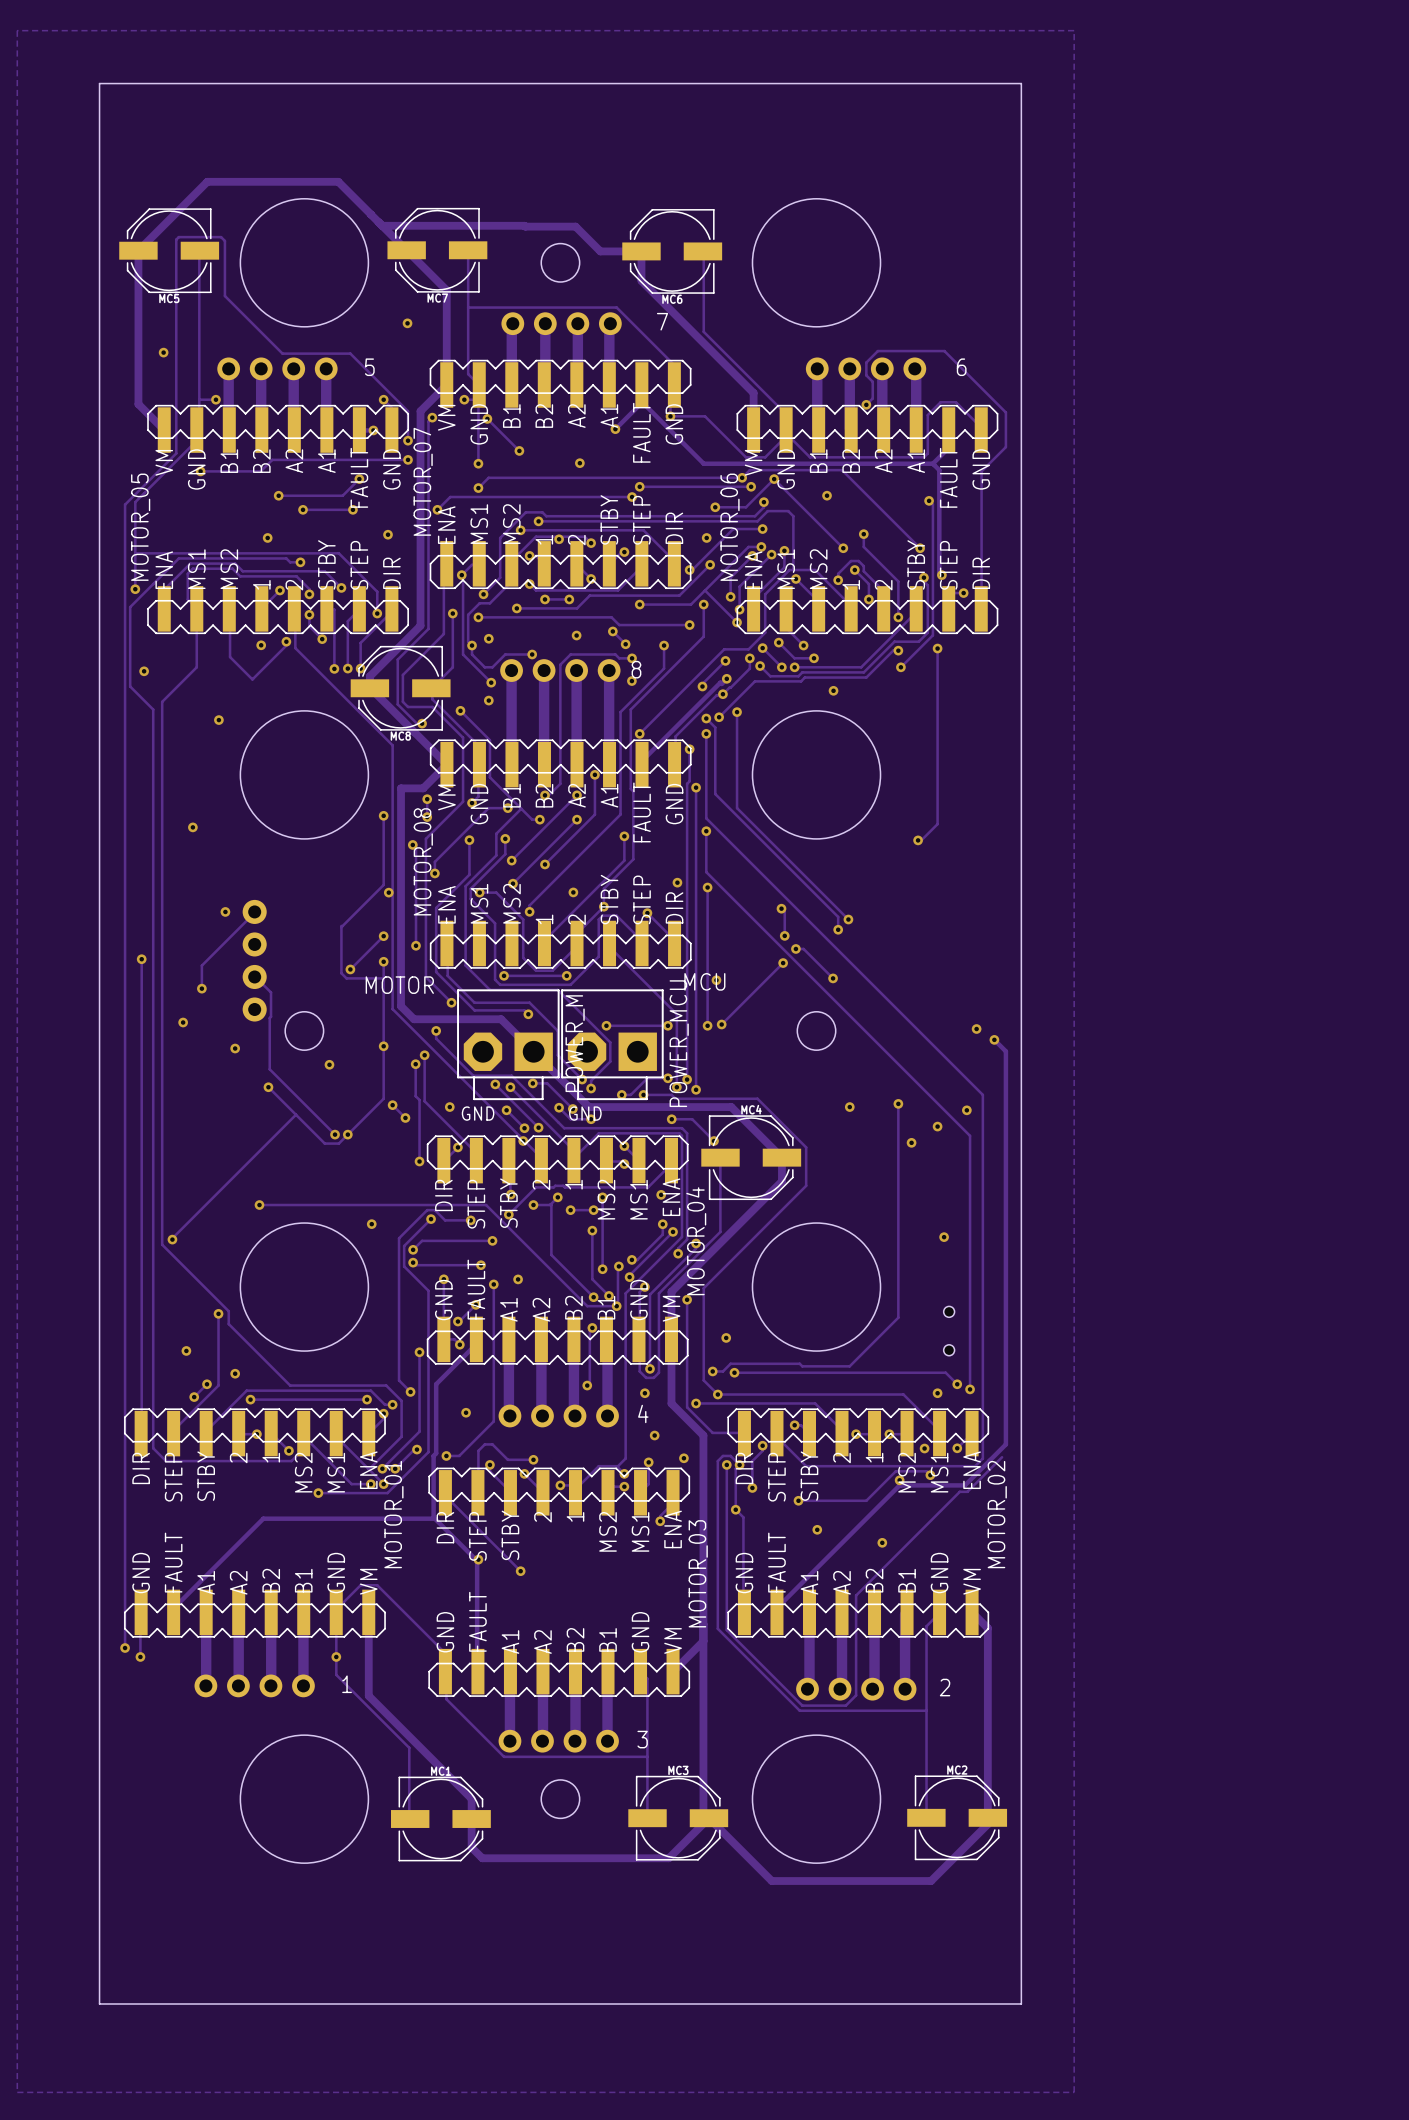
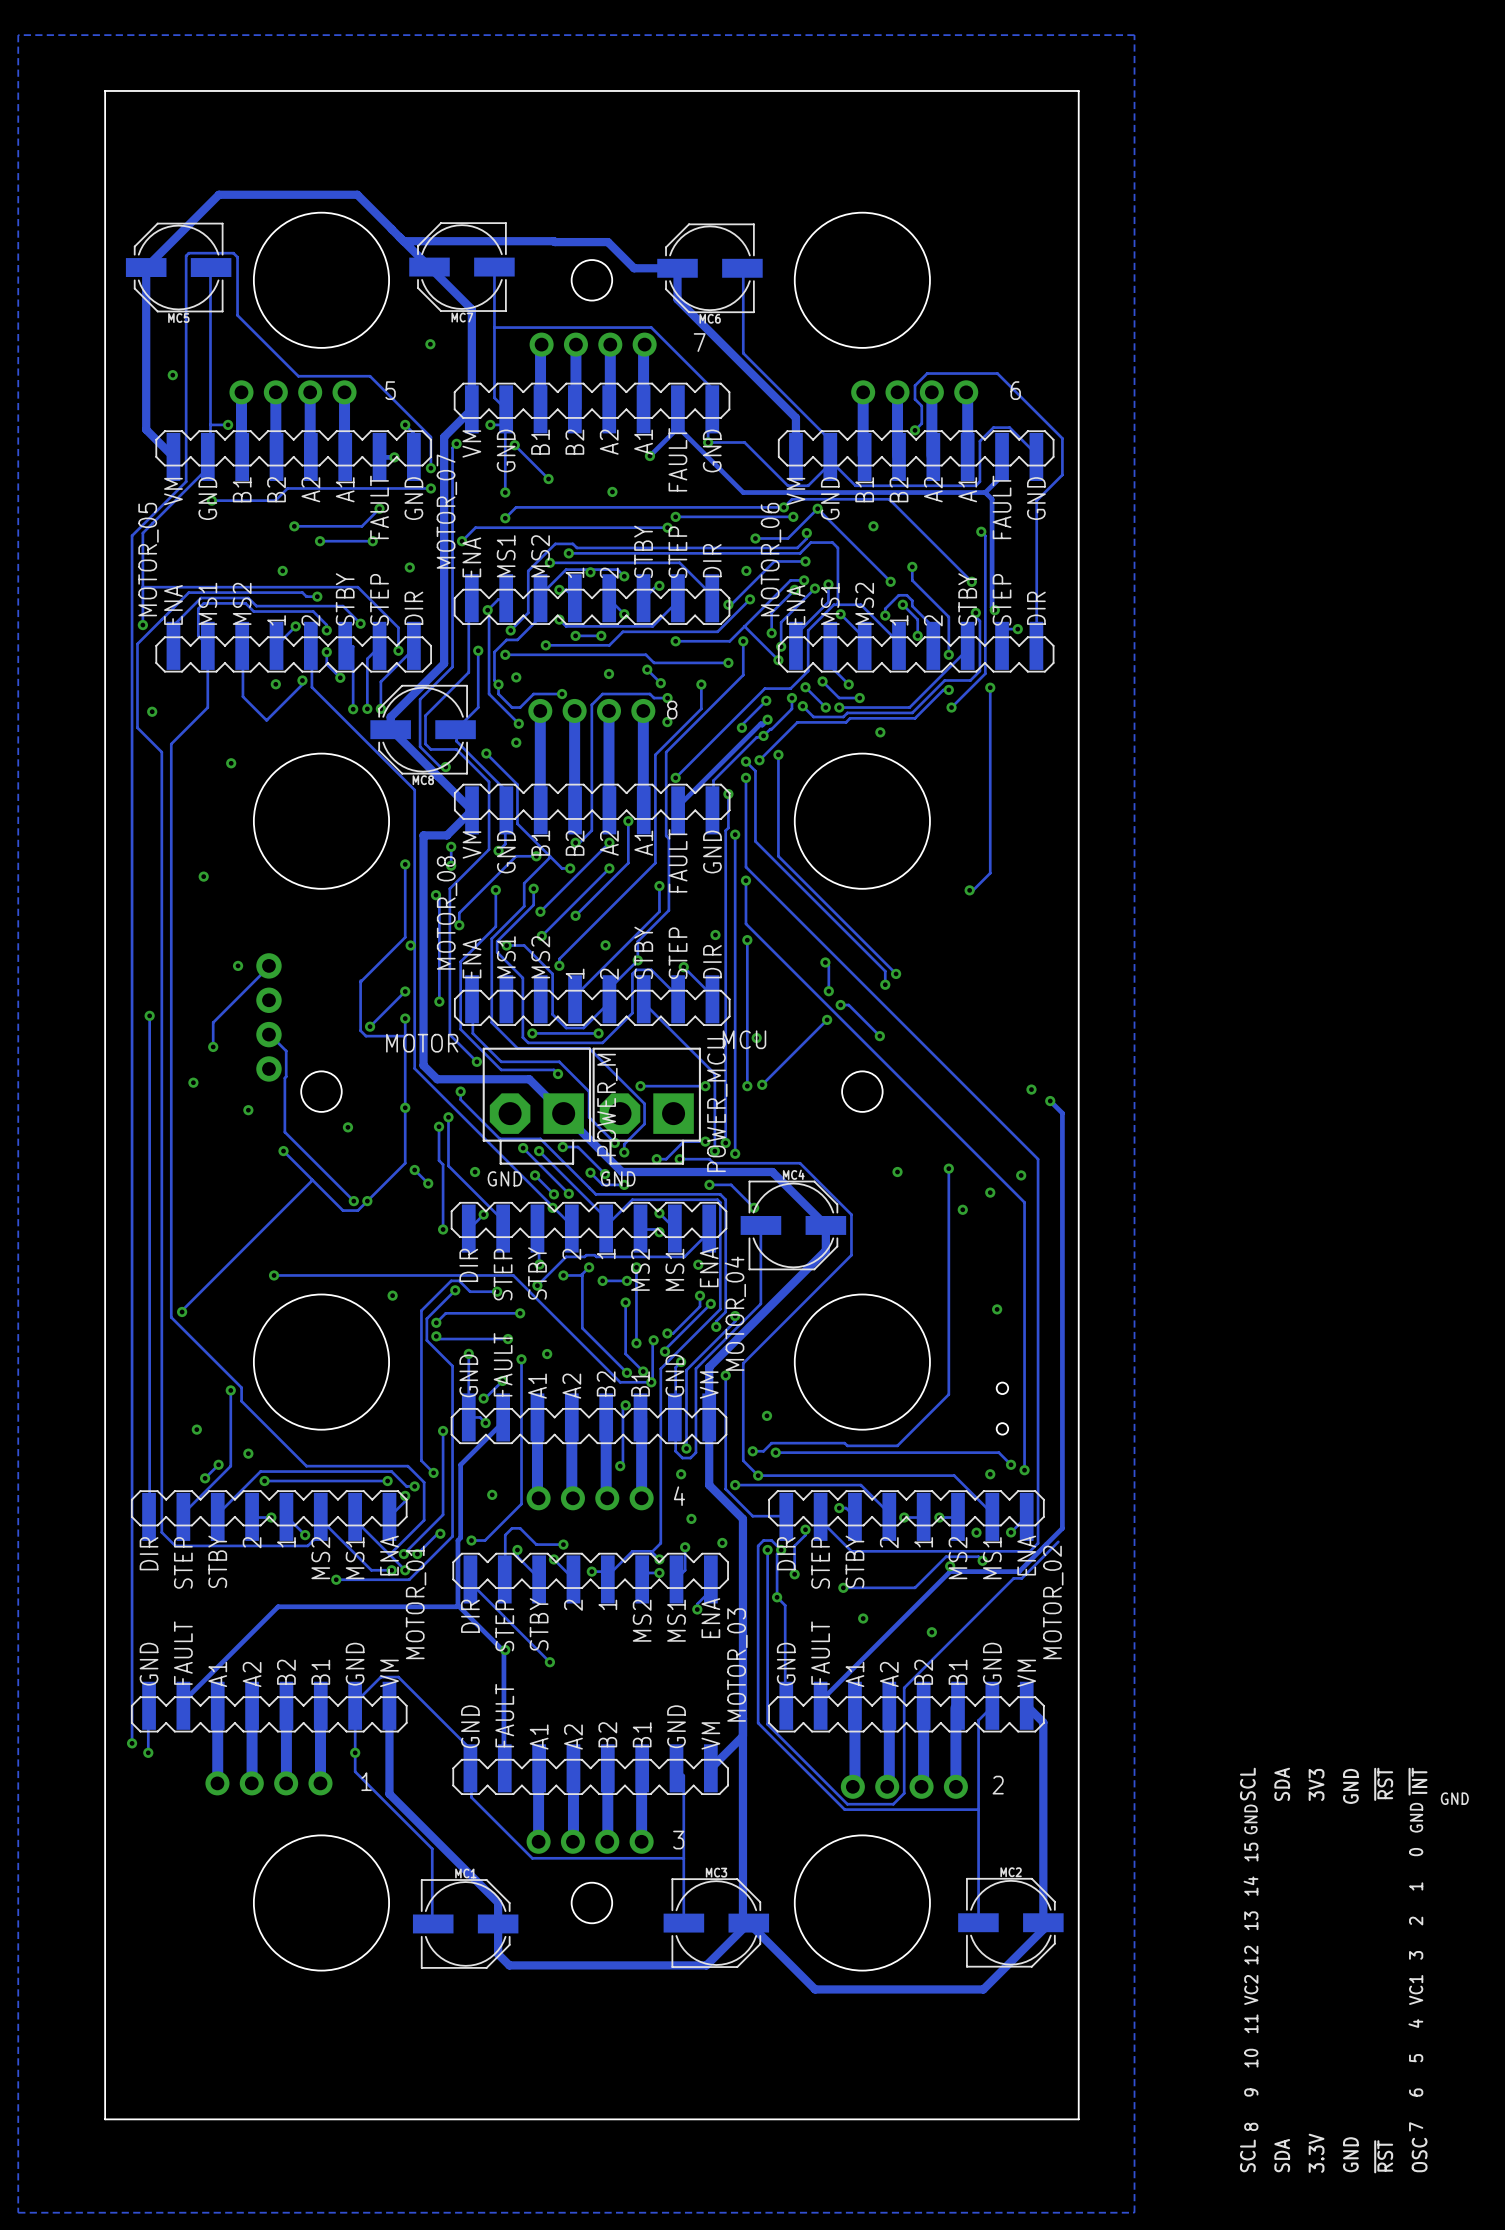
part: none -> (1354, 1970)

